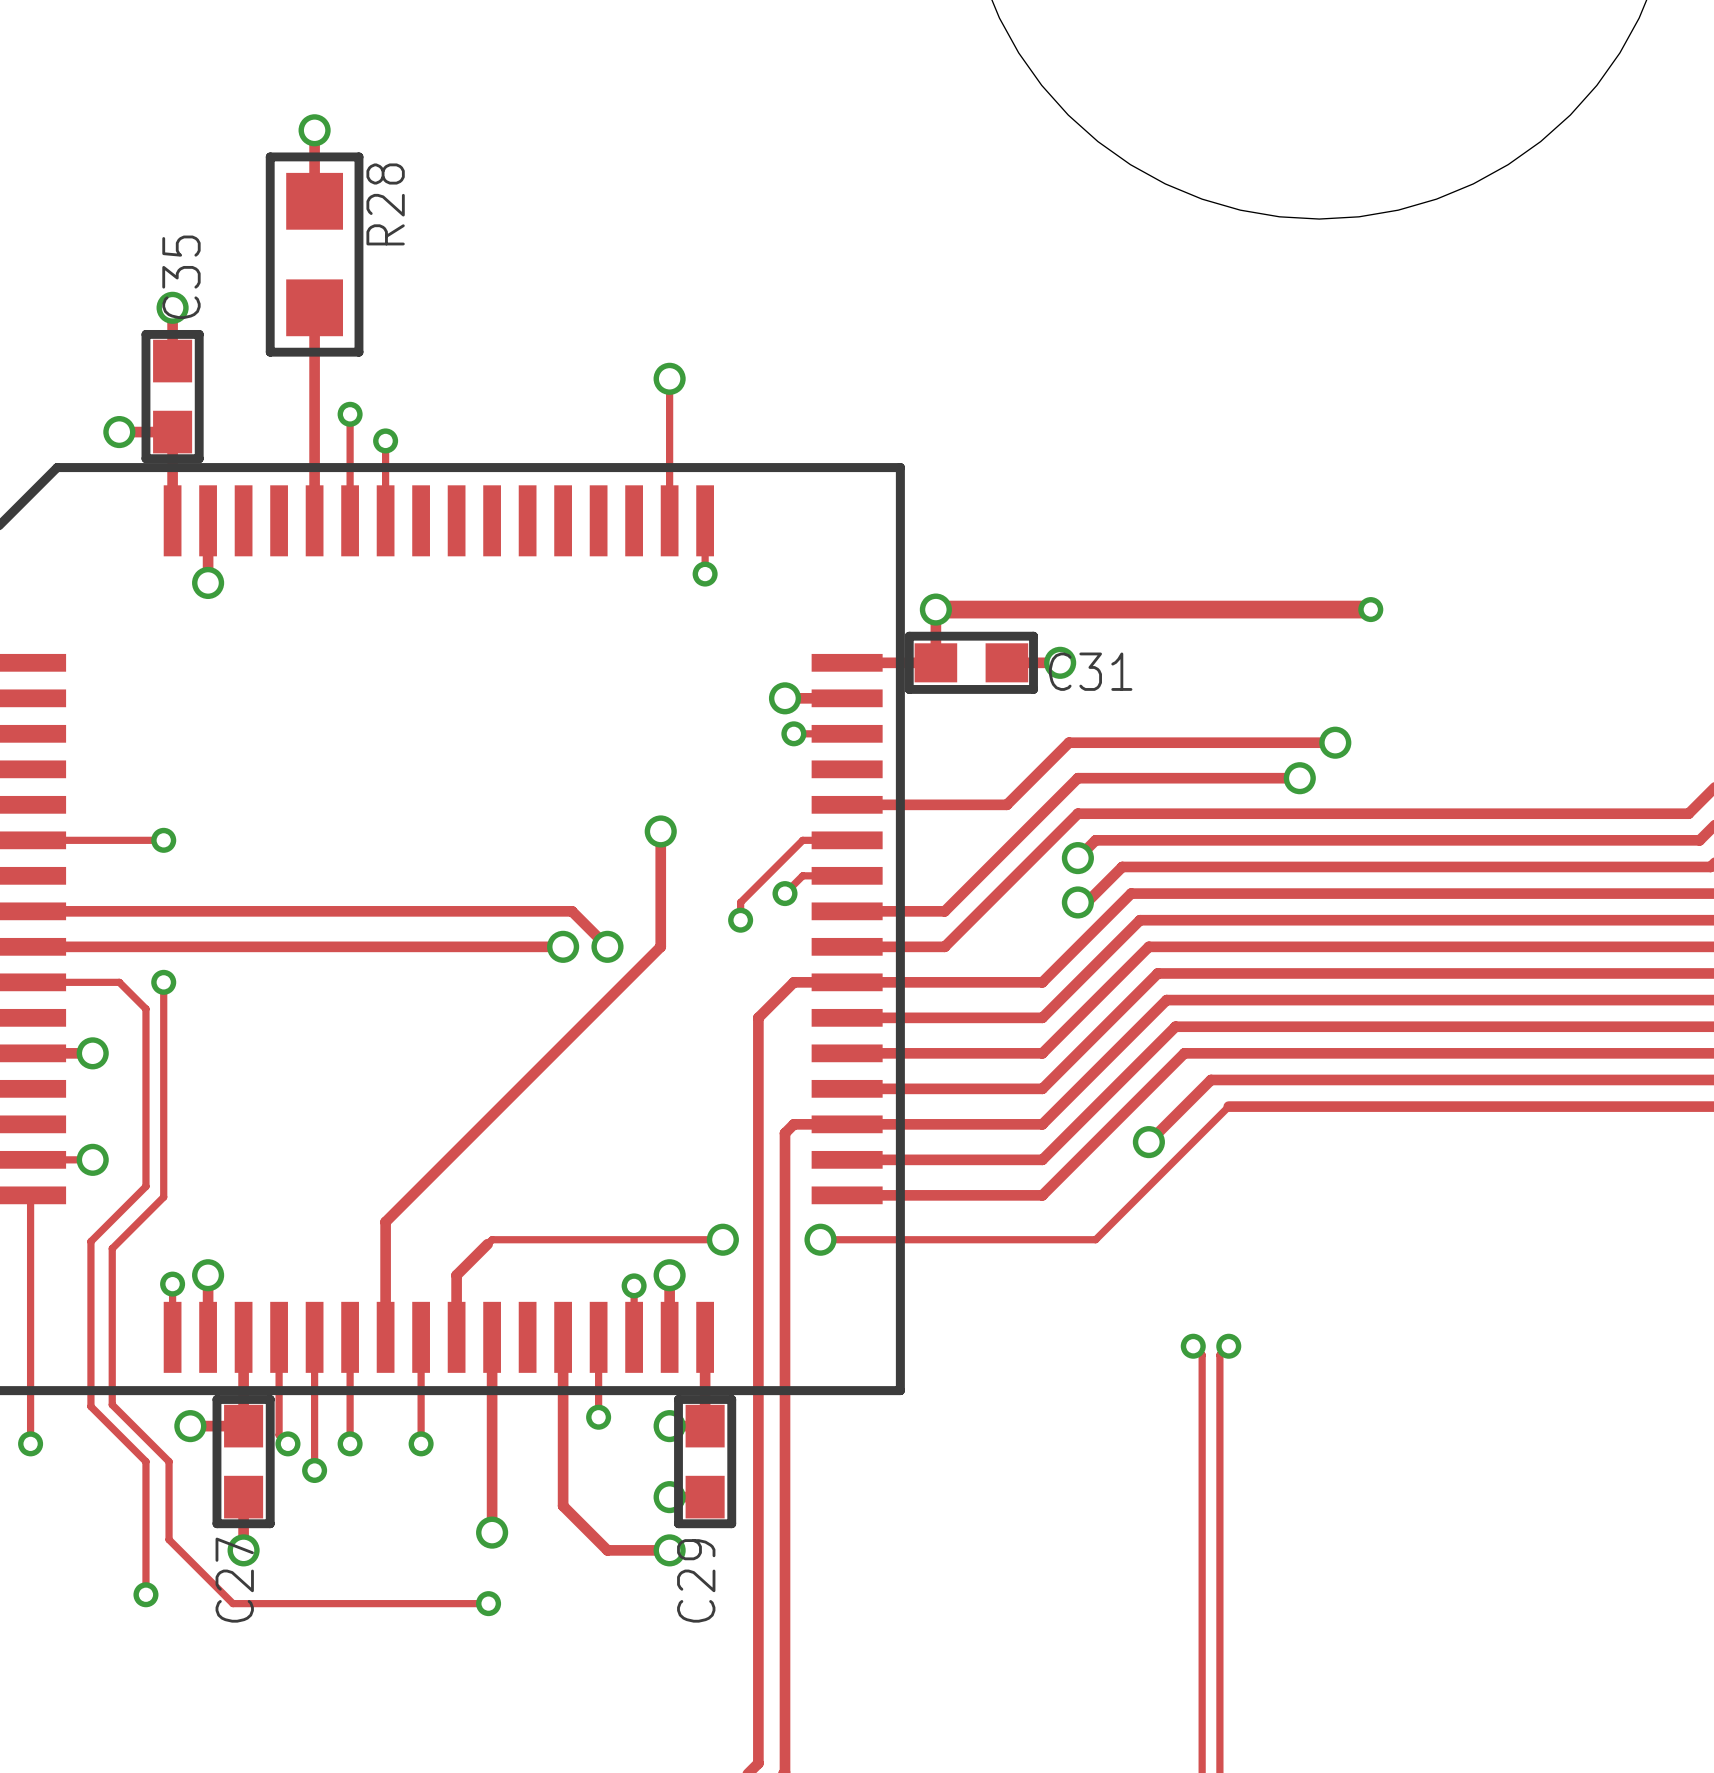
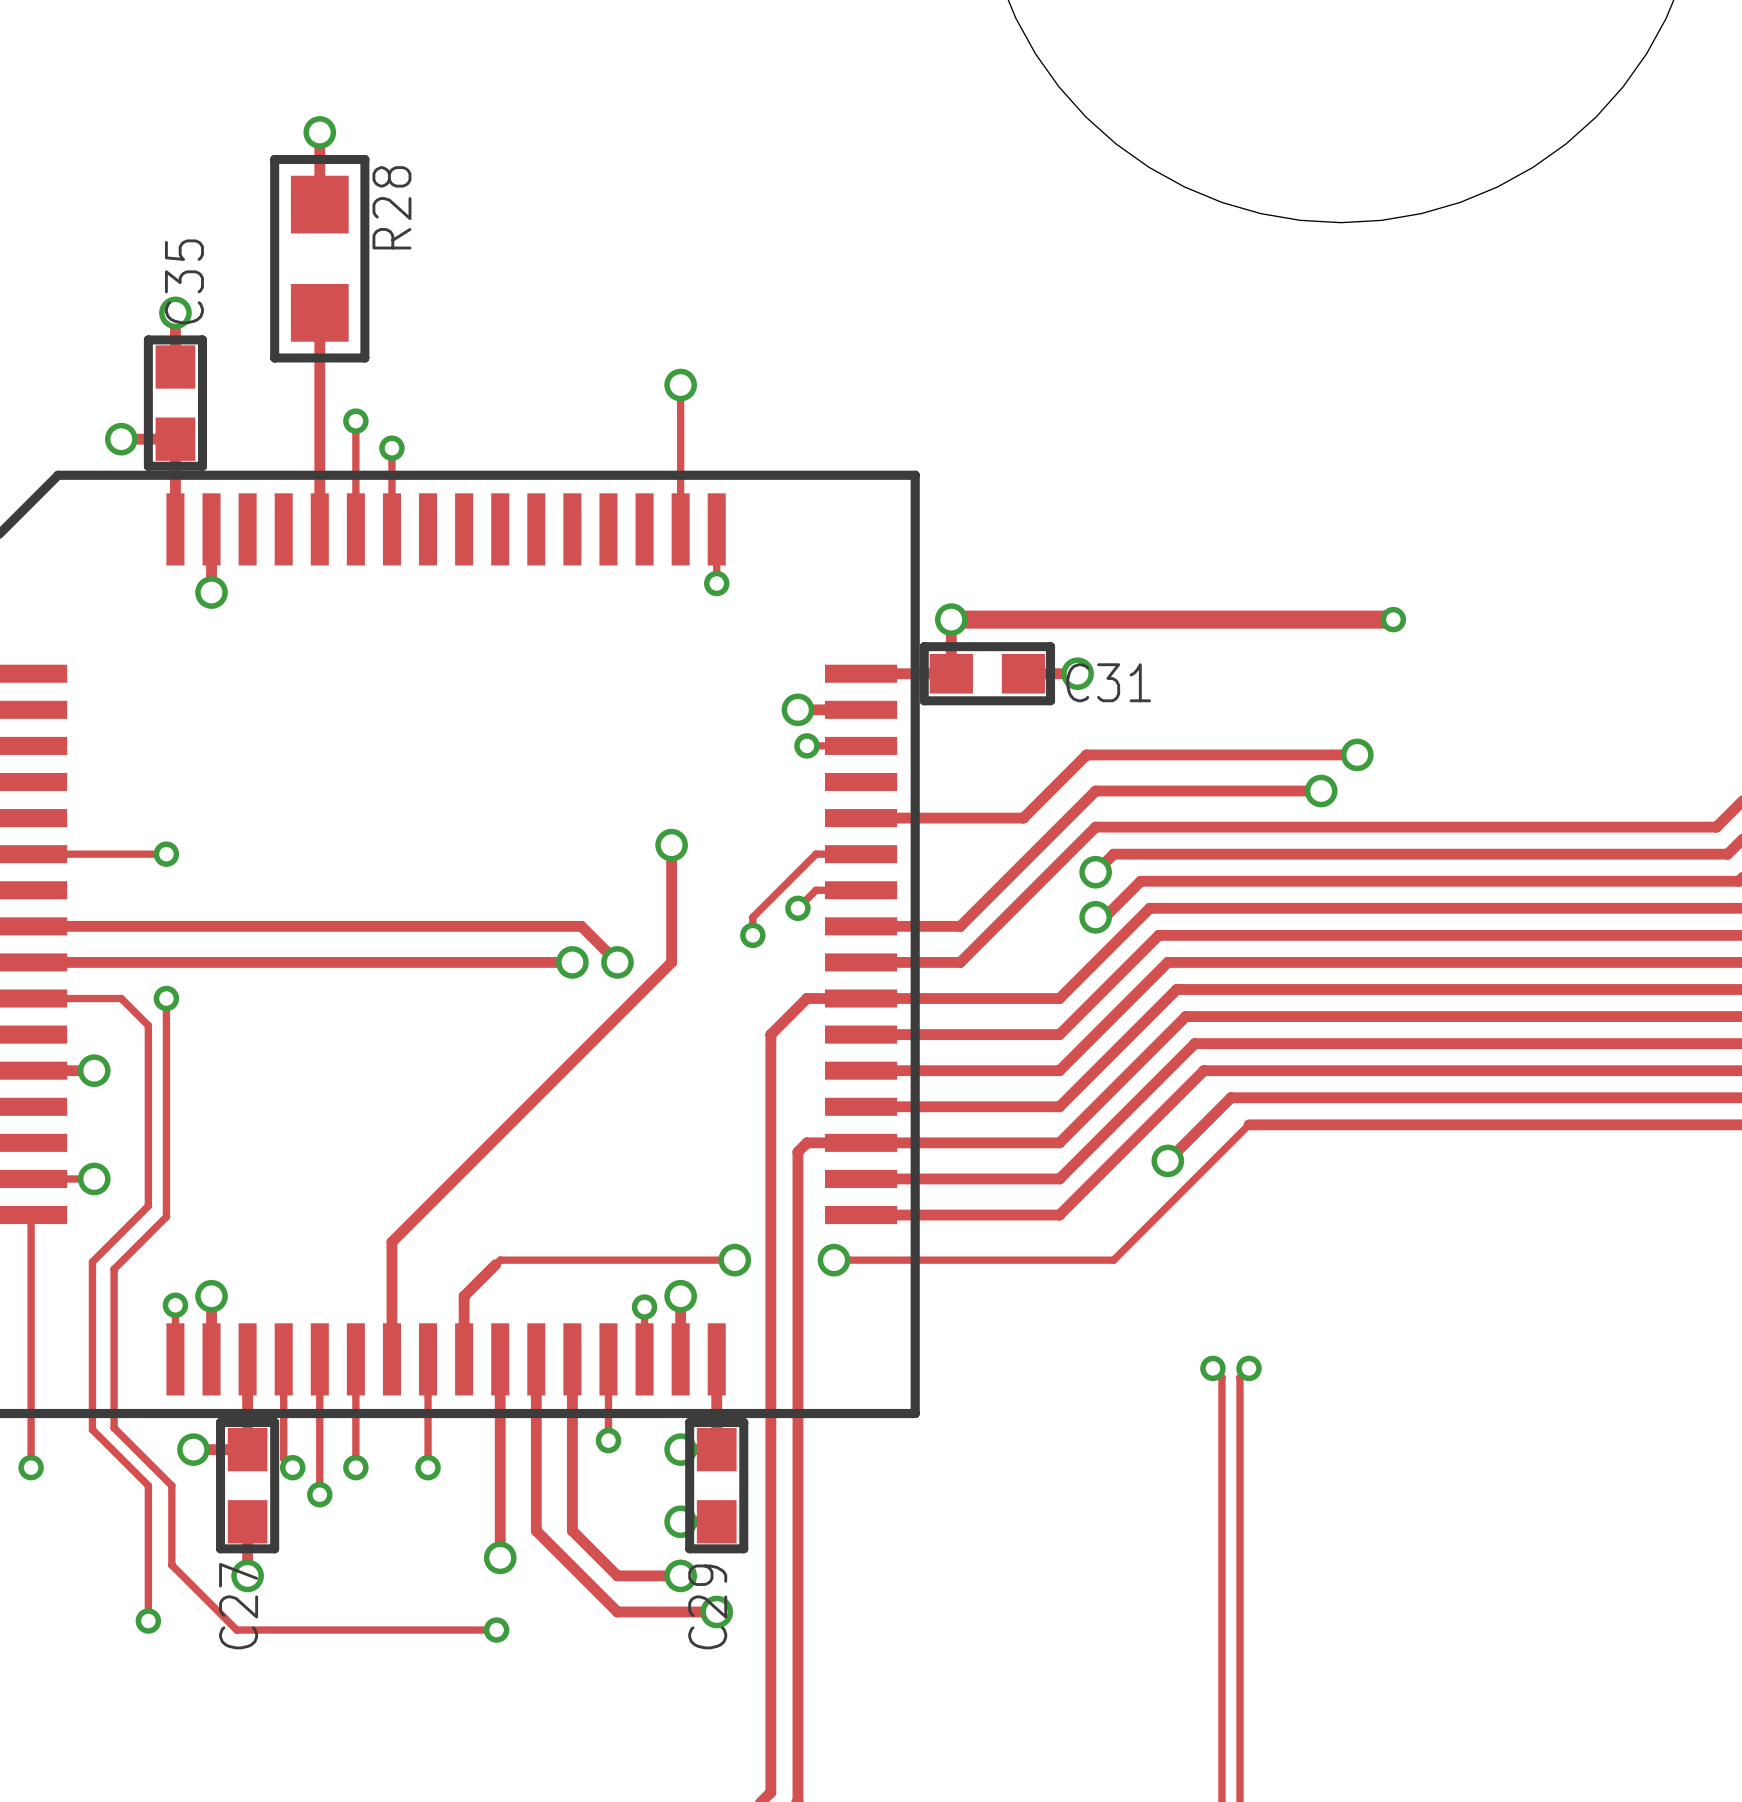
track: none -> (536, 1359) (536, 1530) (617, 1611) (716, 1611)
via: none -> (716, 1611)

